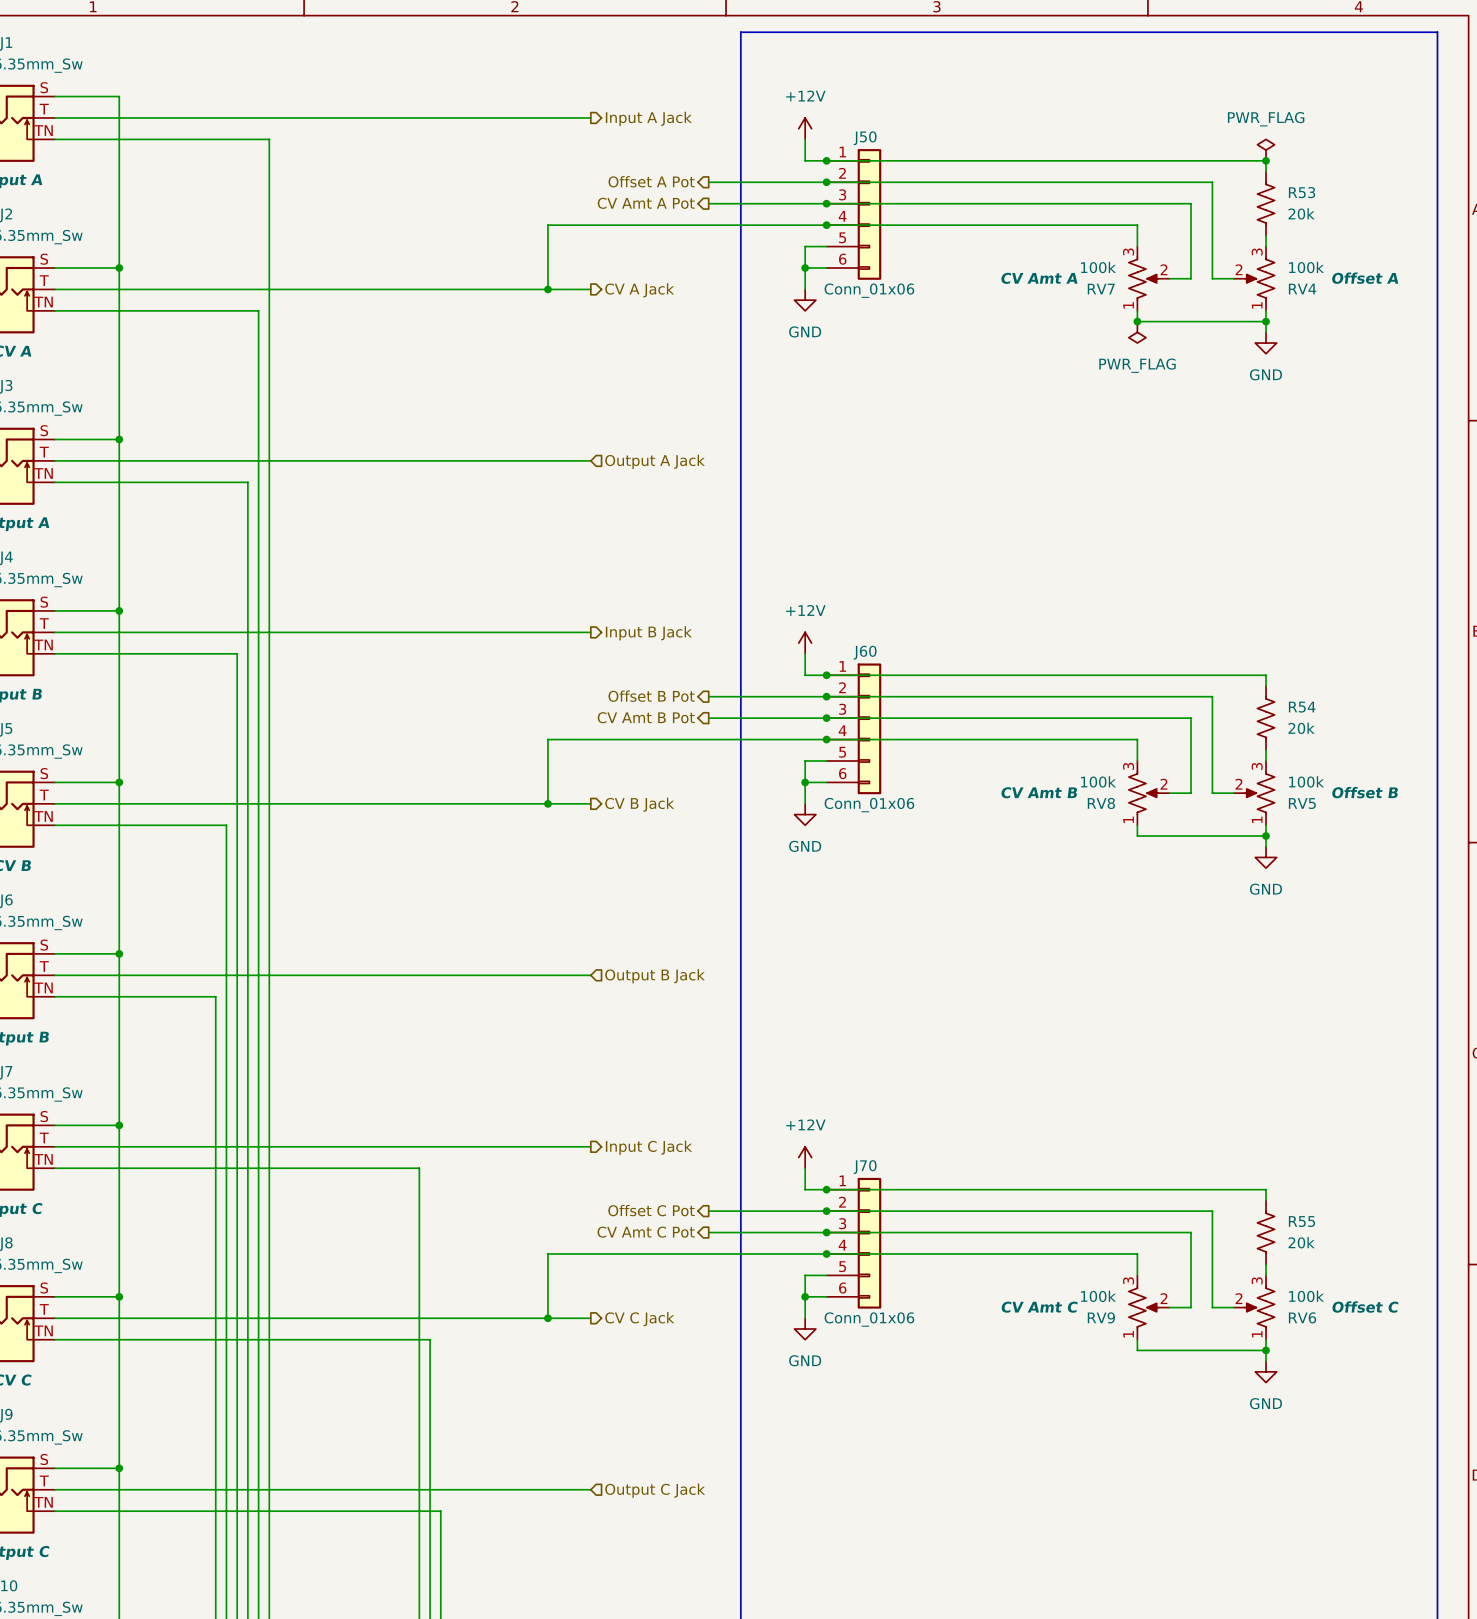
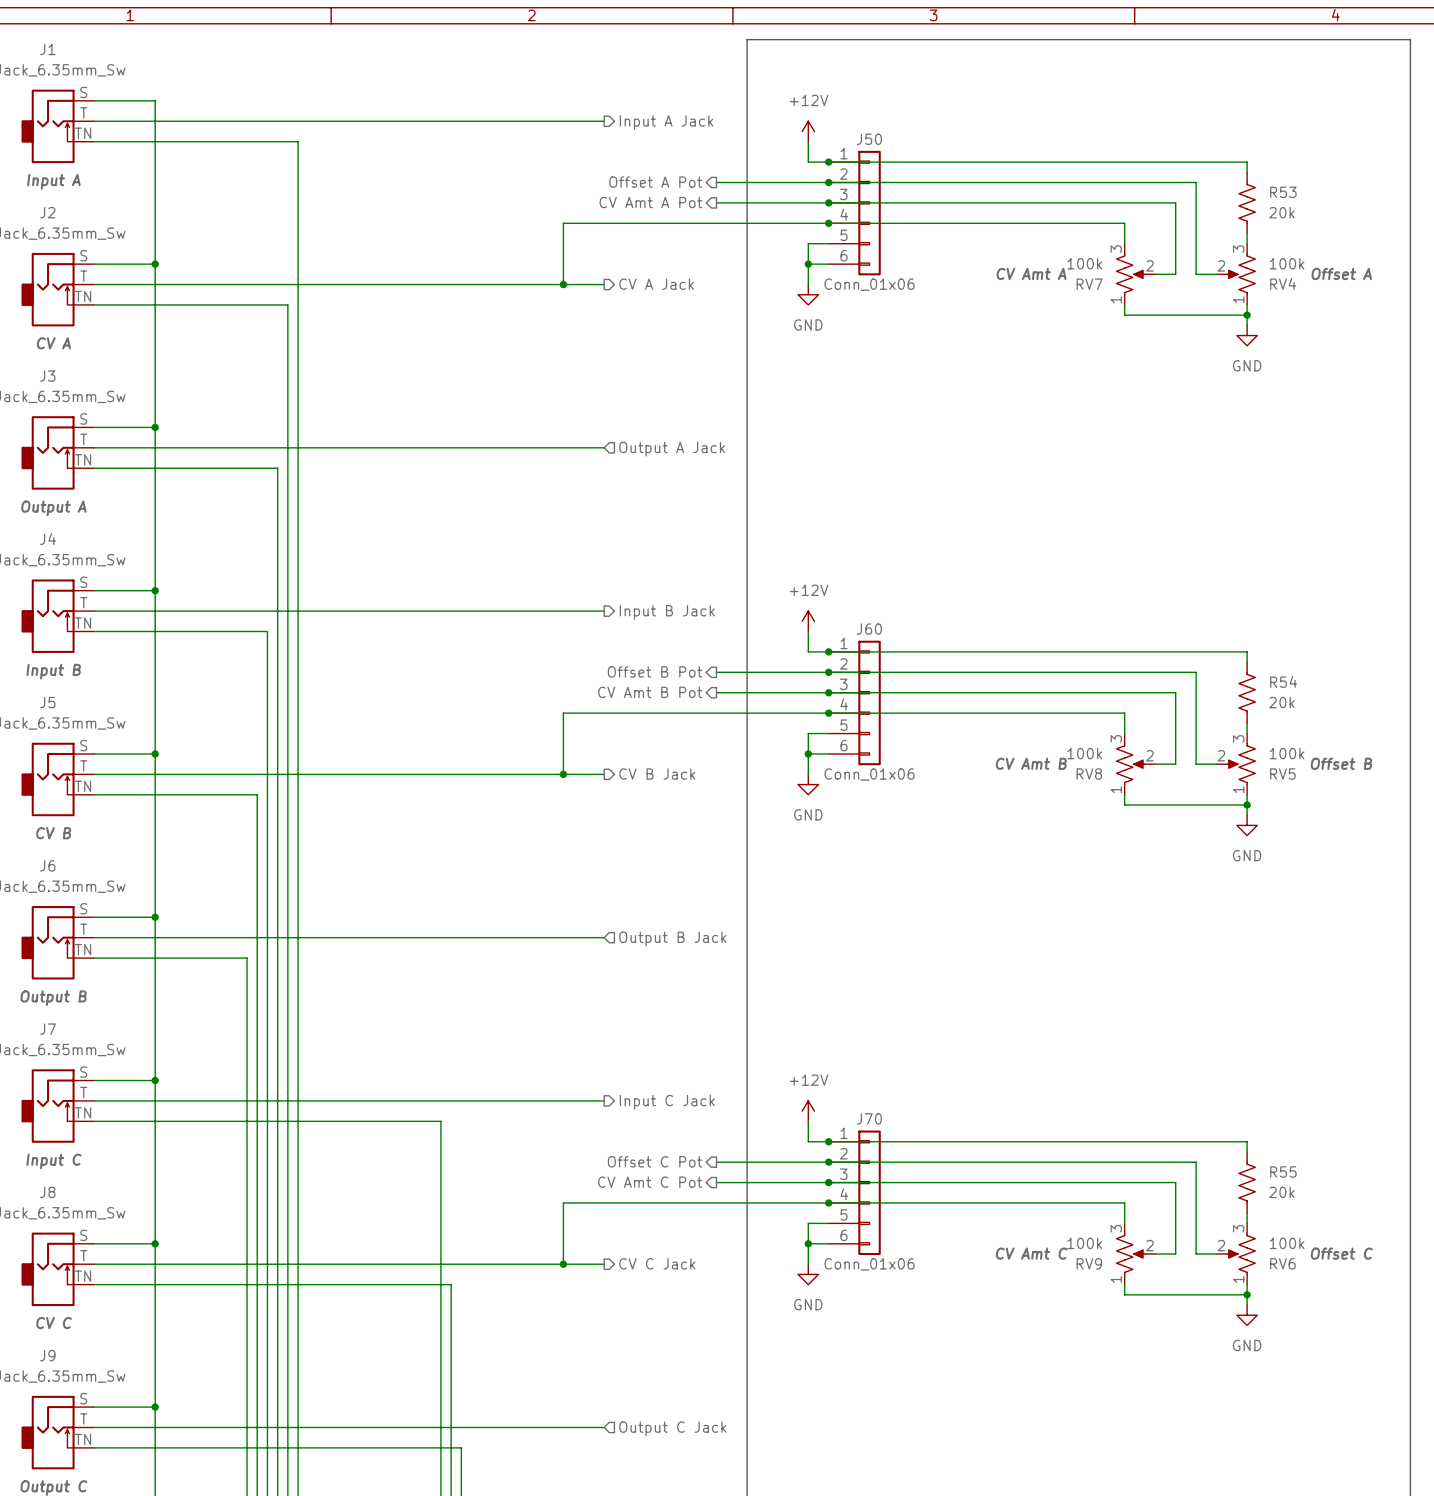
power symbol: PWR_FLAG (1266, 150) -> none
junction: (1266, 160) -> none
junction: (1137, 321) -> none
power symbol: PWR_FLAG (1137, 332) -> none

